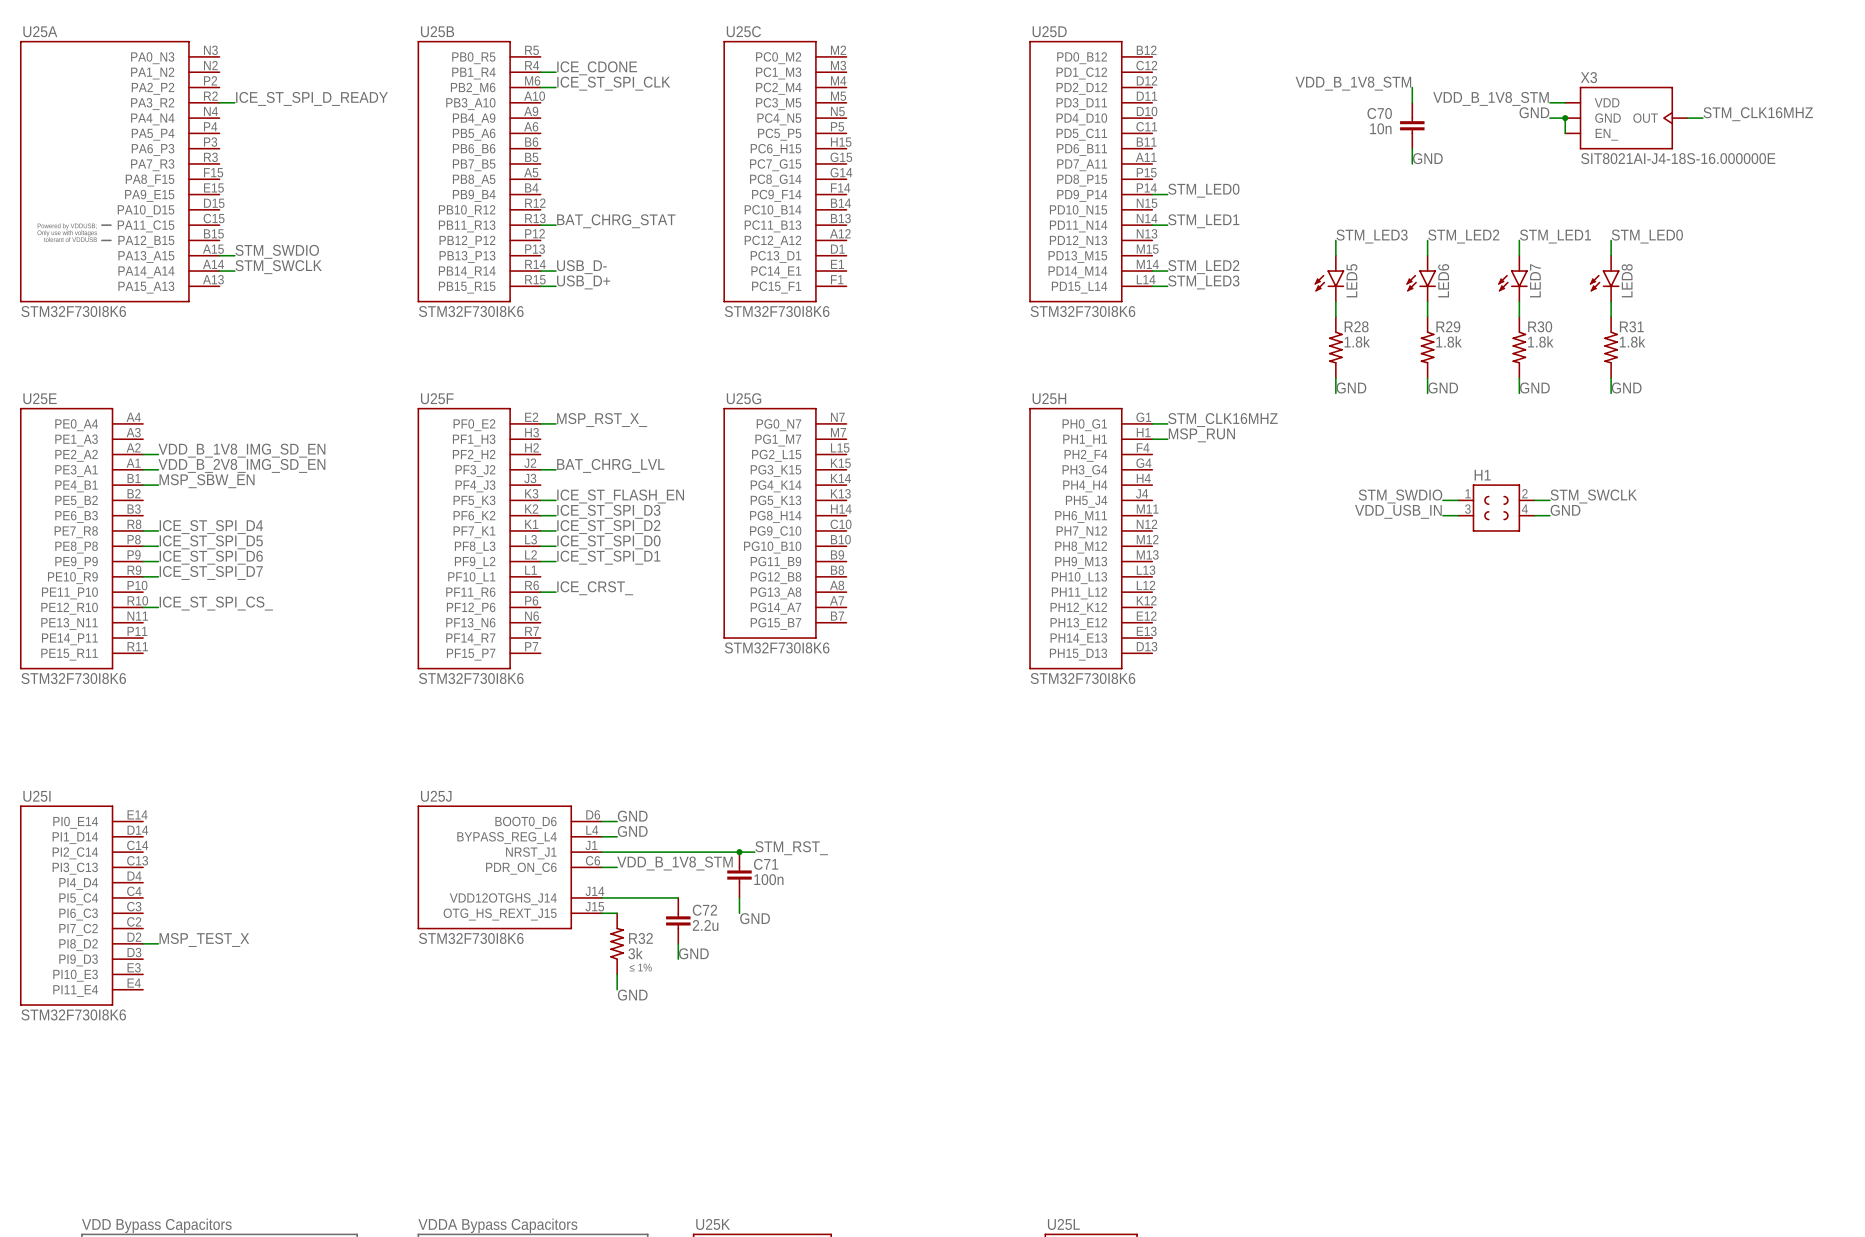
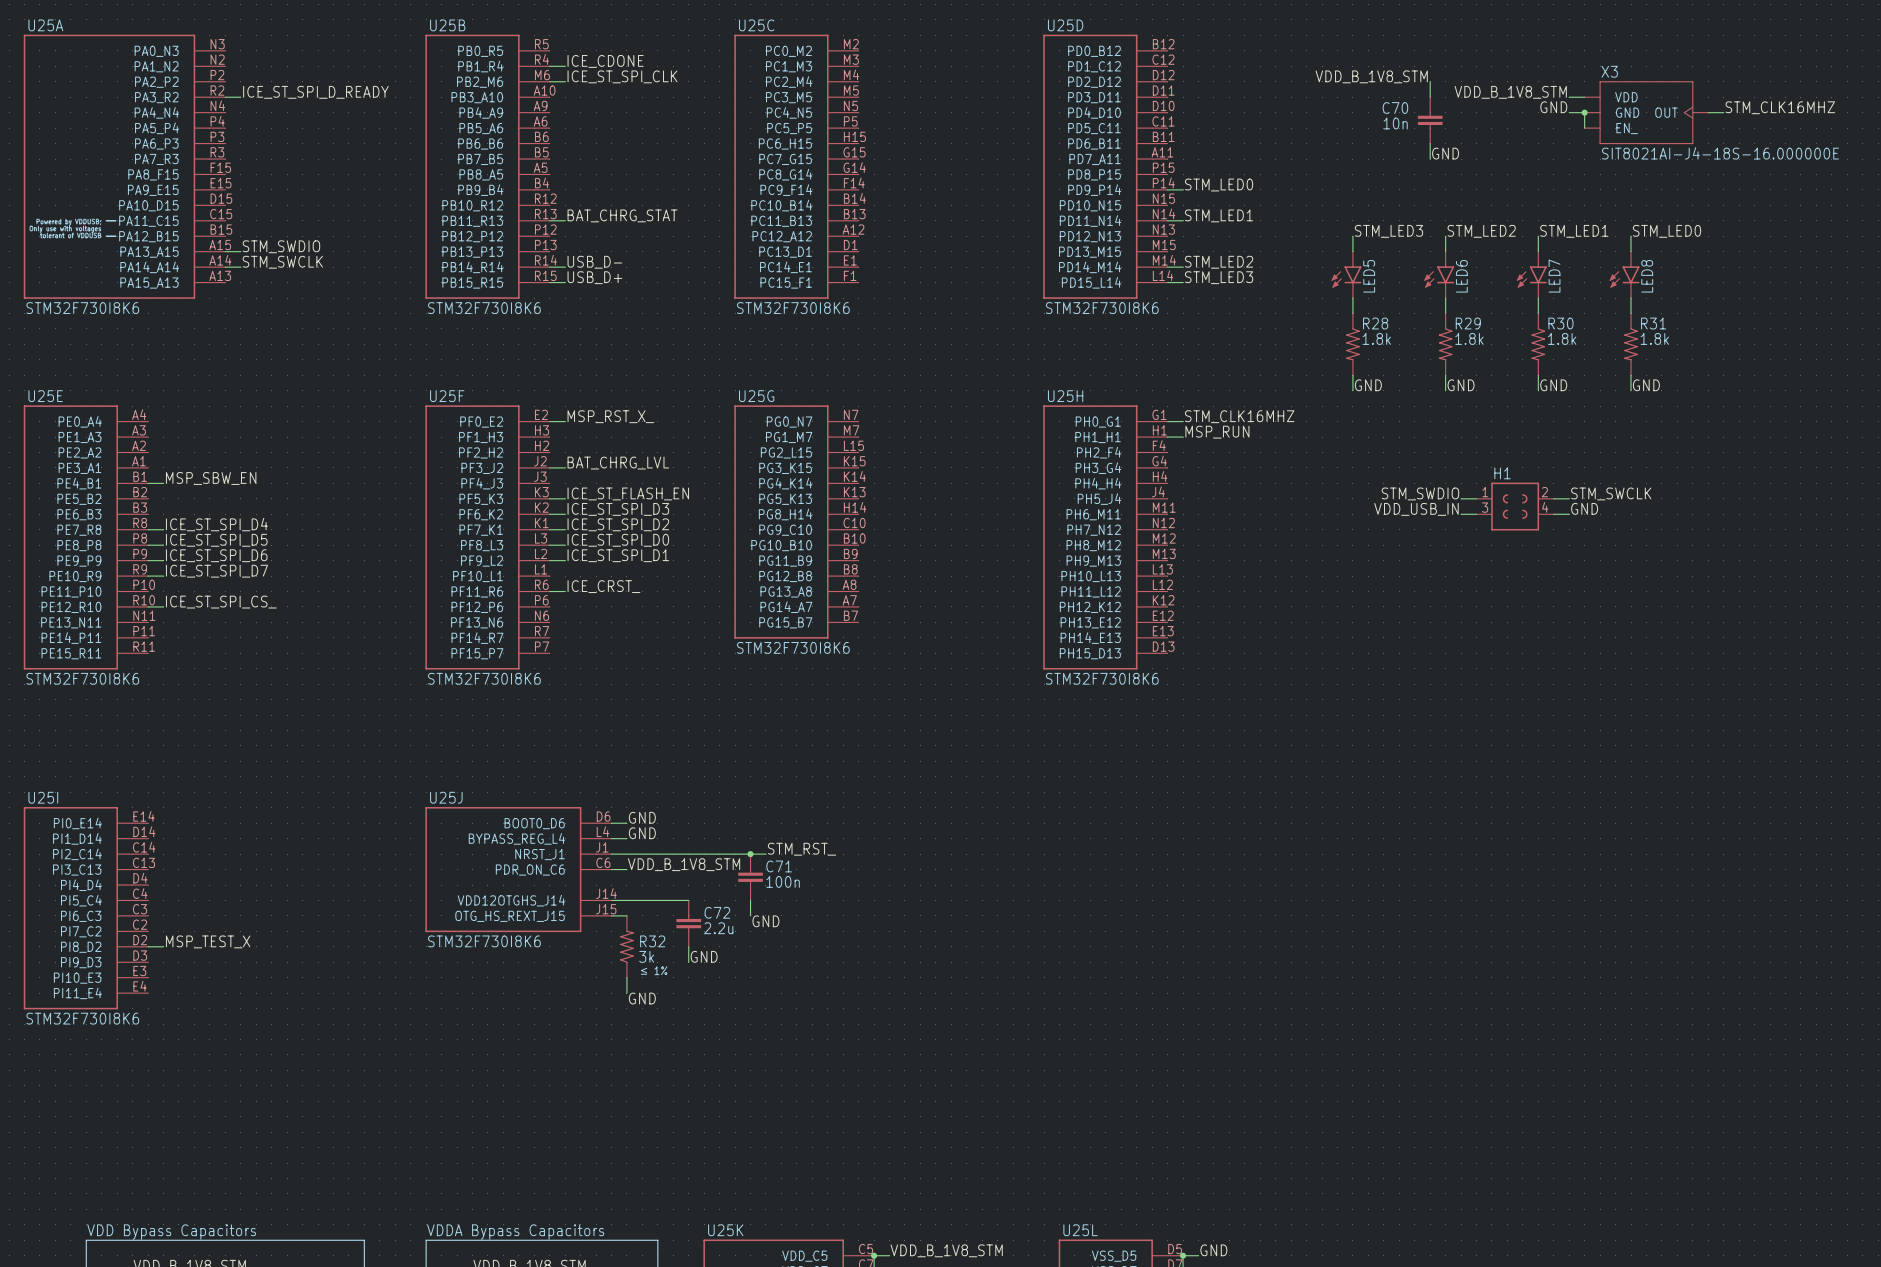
label: VDD_B_1V8_IMG_SD_EN (241, 450) -> none
wire: (143, 454) (158, 454) -> none
label: VDD_B_2V8_IMG_SD_EN (241, 465) -> none
wire: (143, 469) (158, 469) -> none

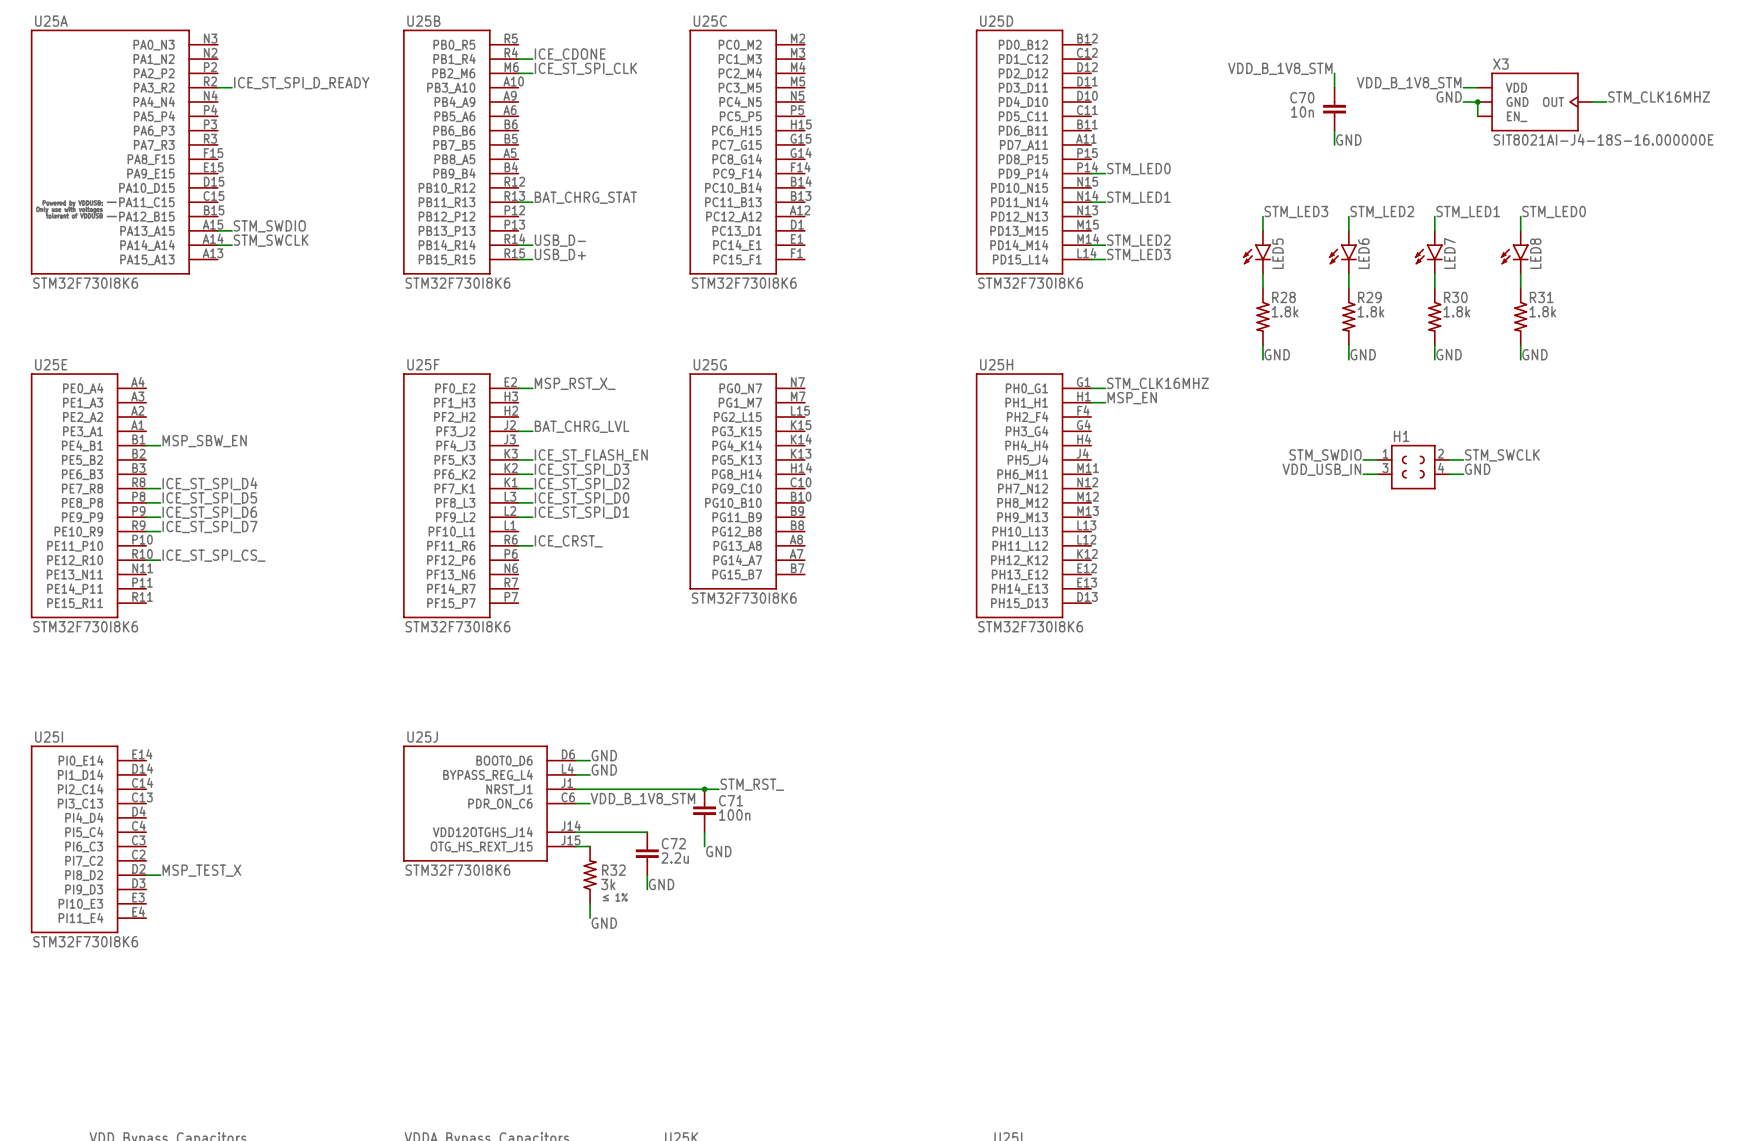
label: MSP_RUN (1217, 432) -> MSP_EN (1132, 398)

